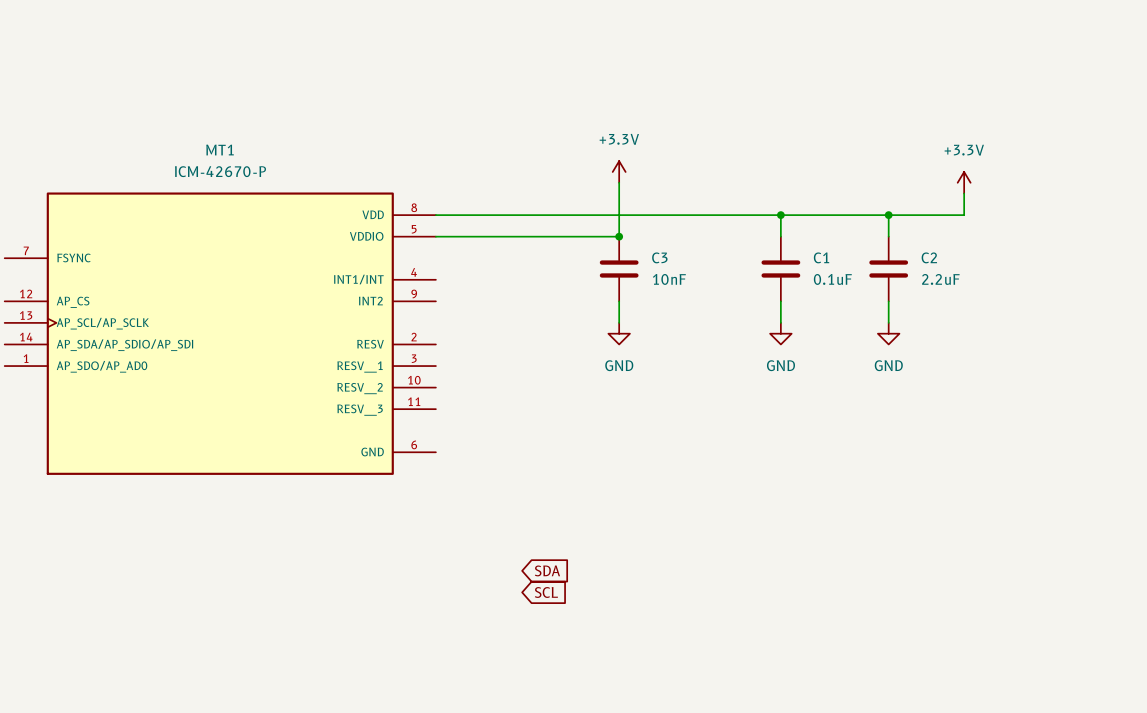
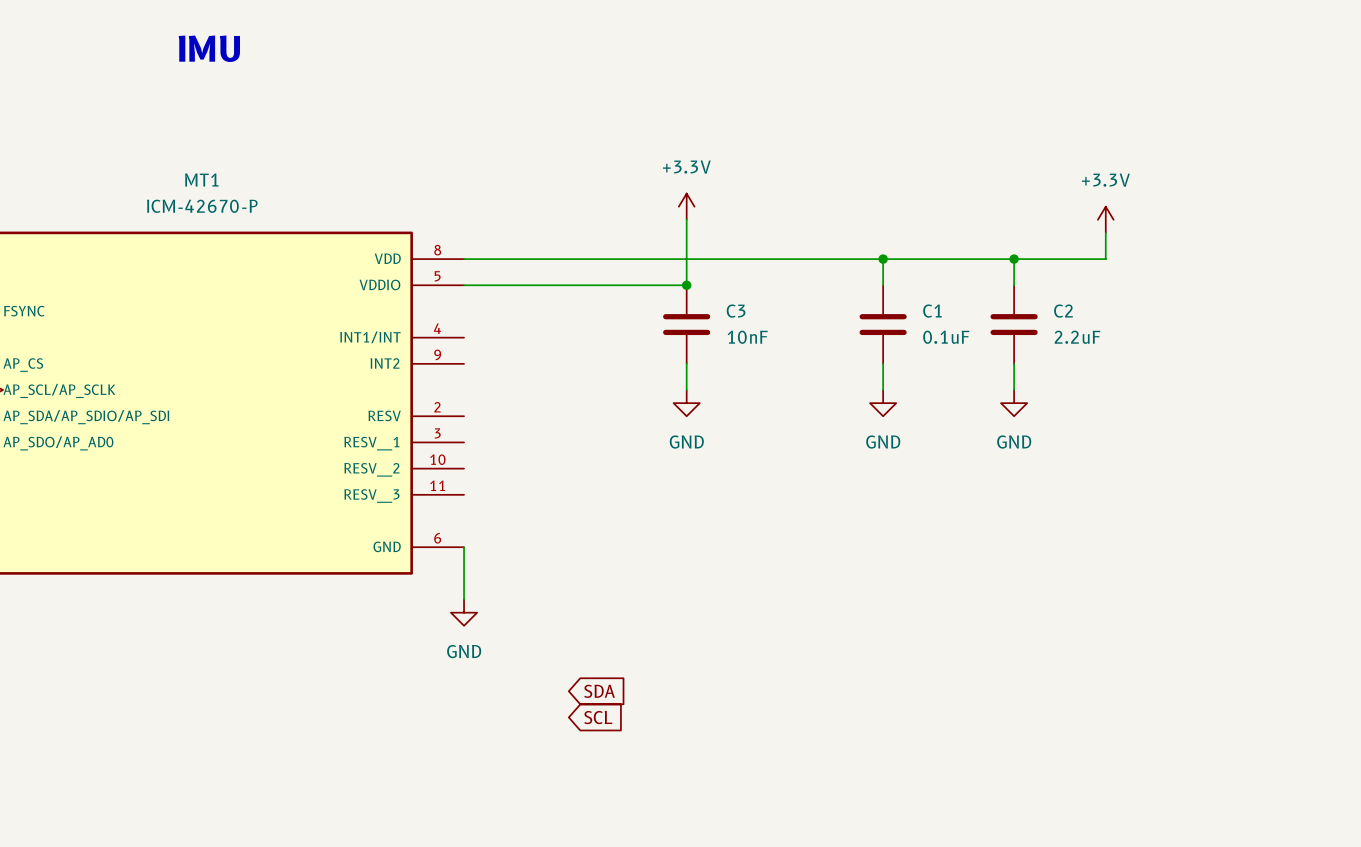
text: none -> IMU (209, 48)
wire: none -> (464, 547) (464, 599)
power symbol: none -> GND (464, 612)

